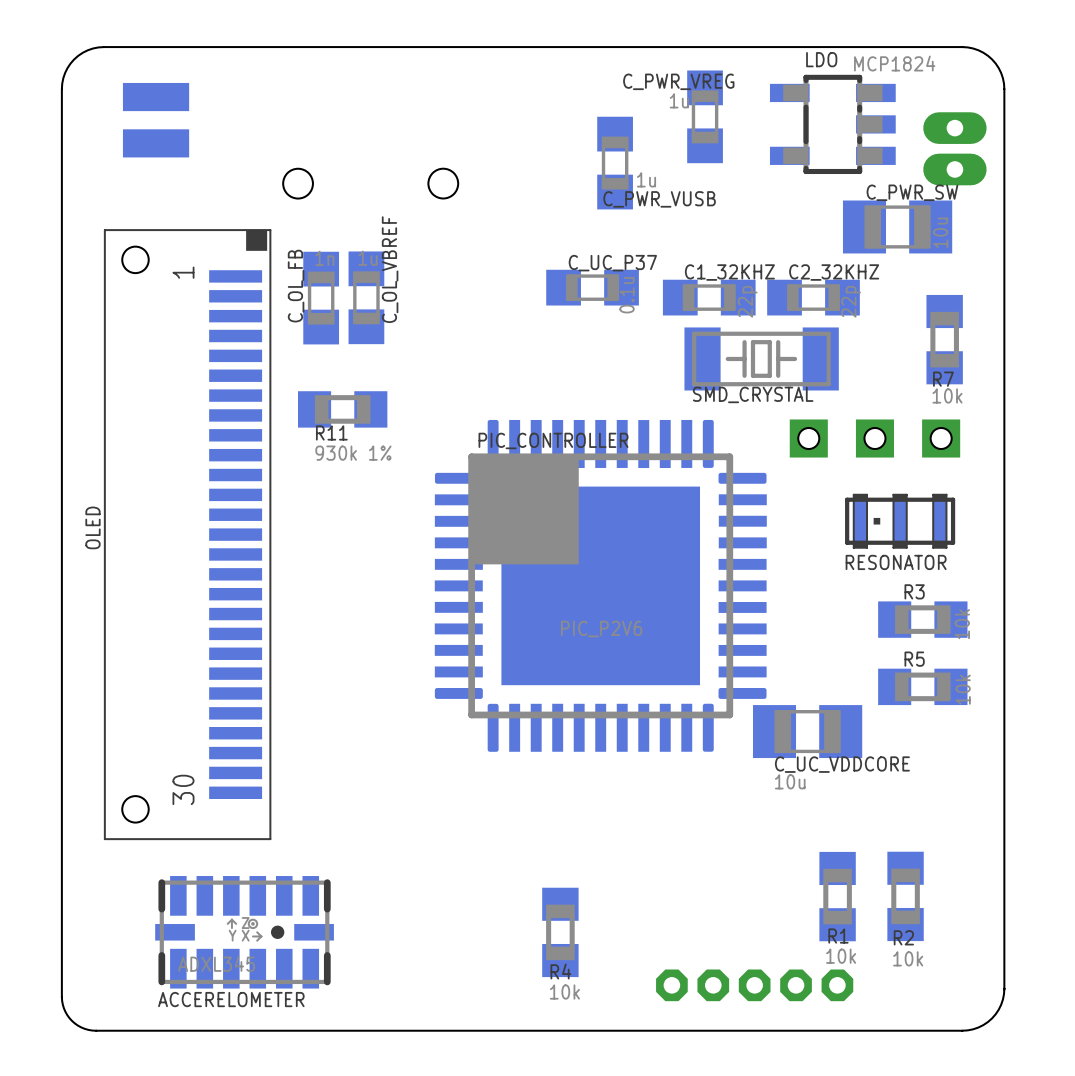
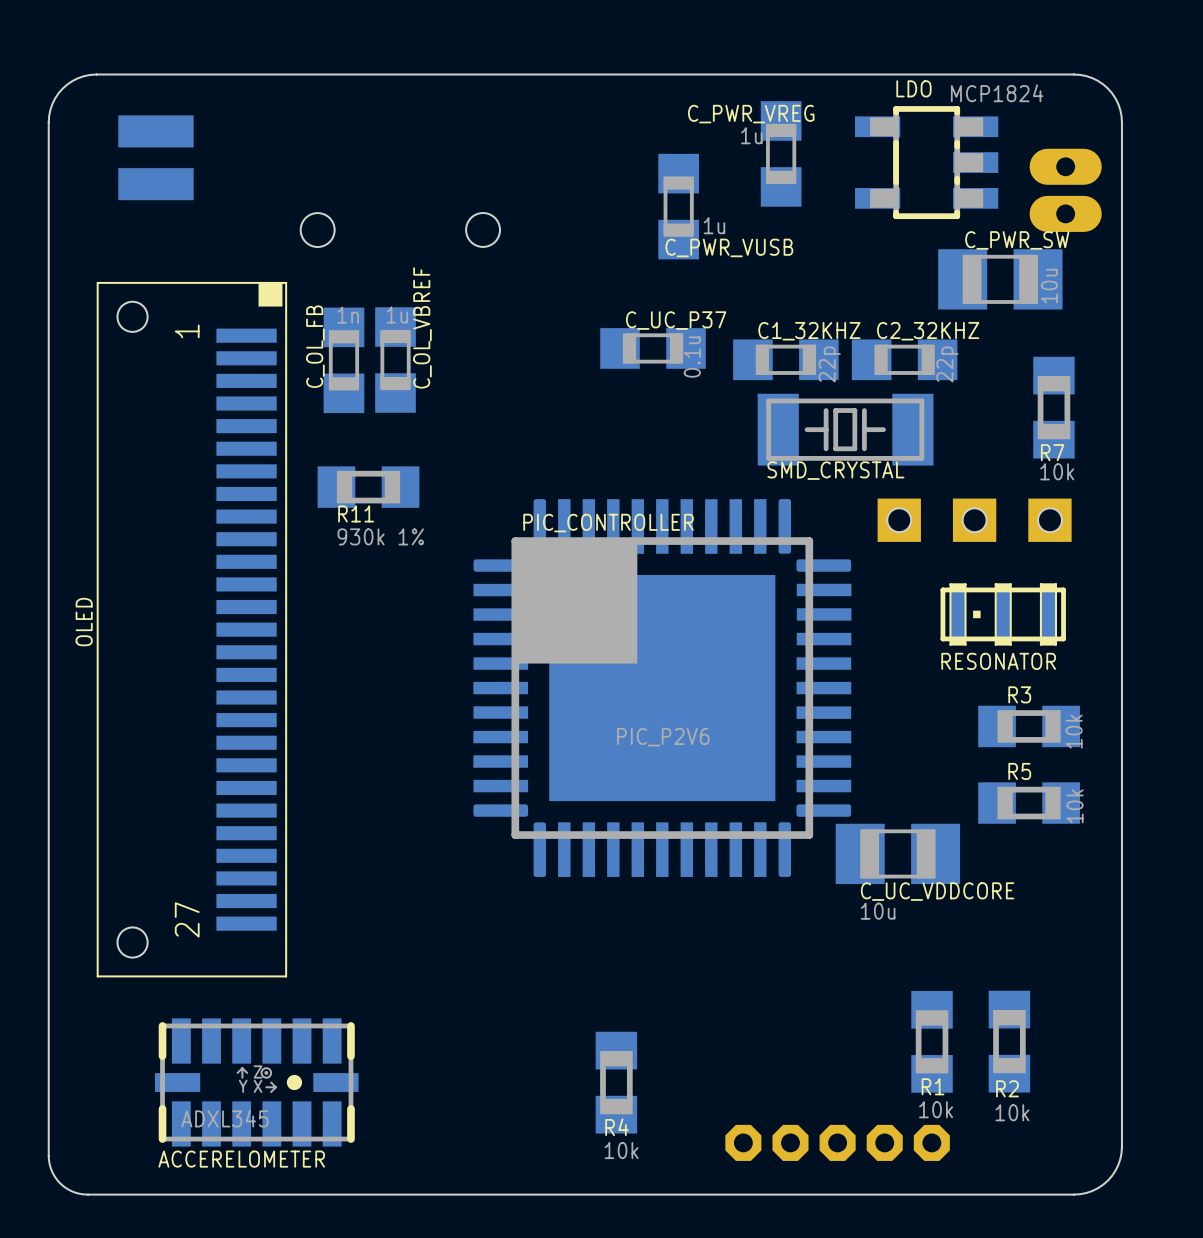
part text: 30 (183, 789) -> 27 (187, 919)

